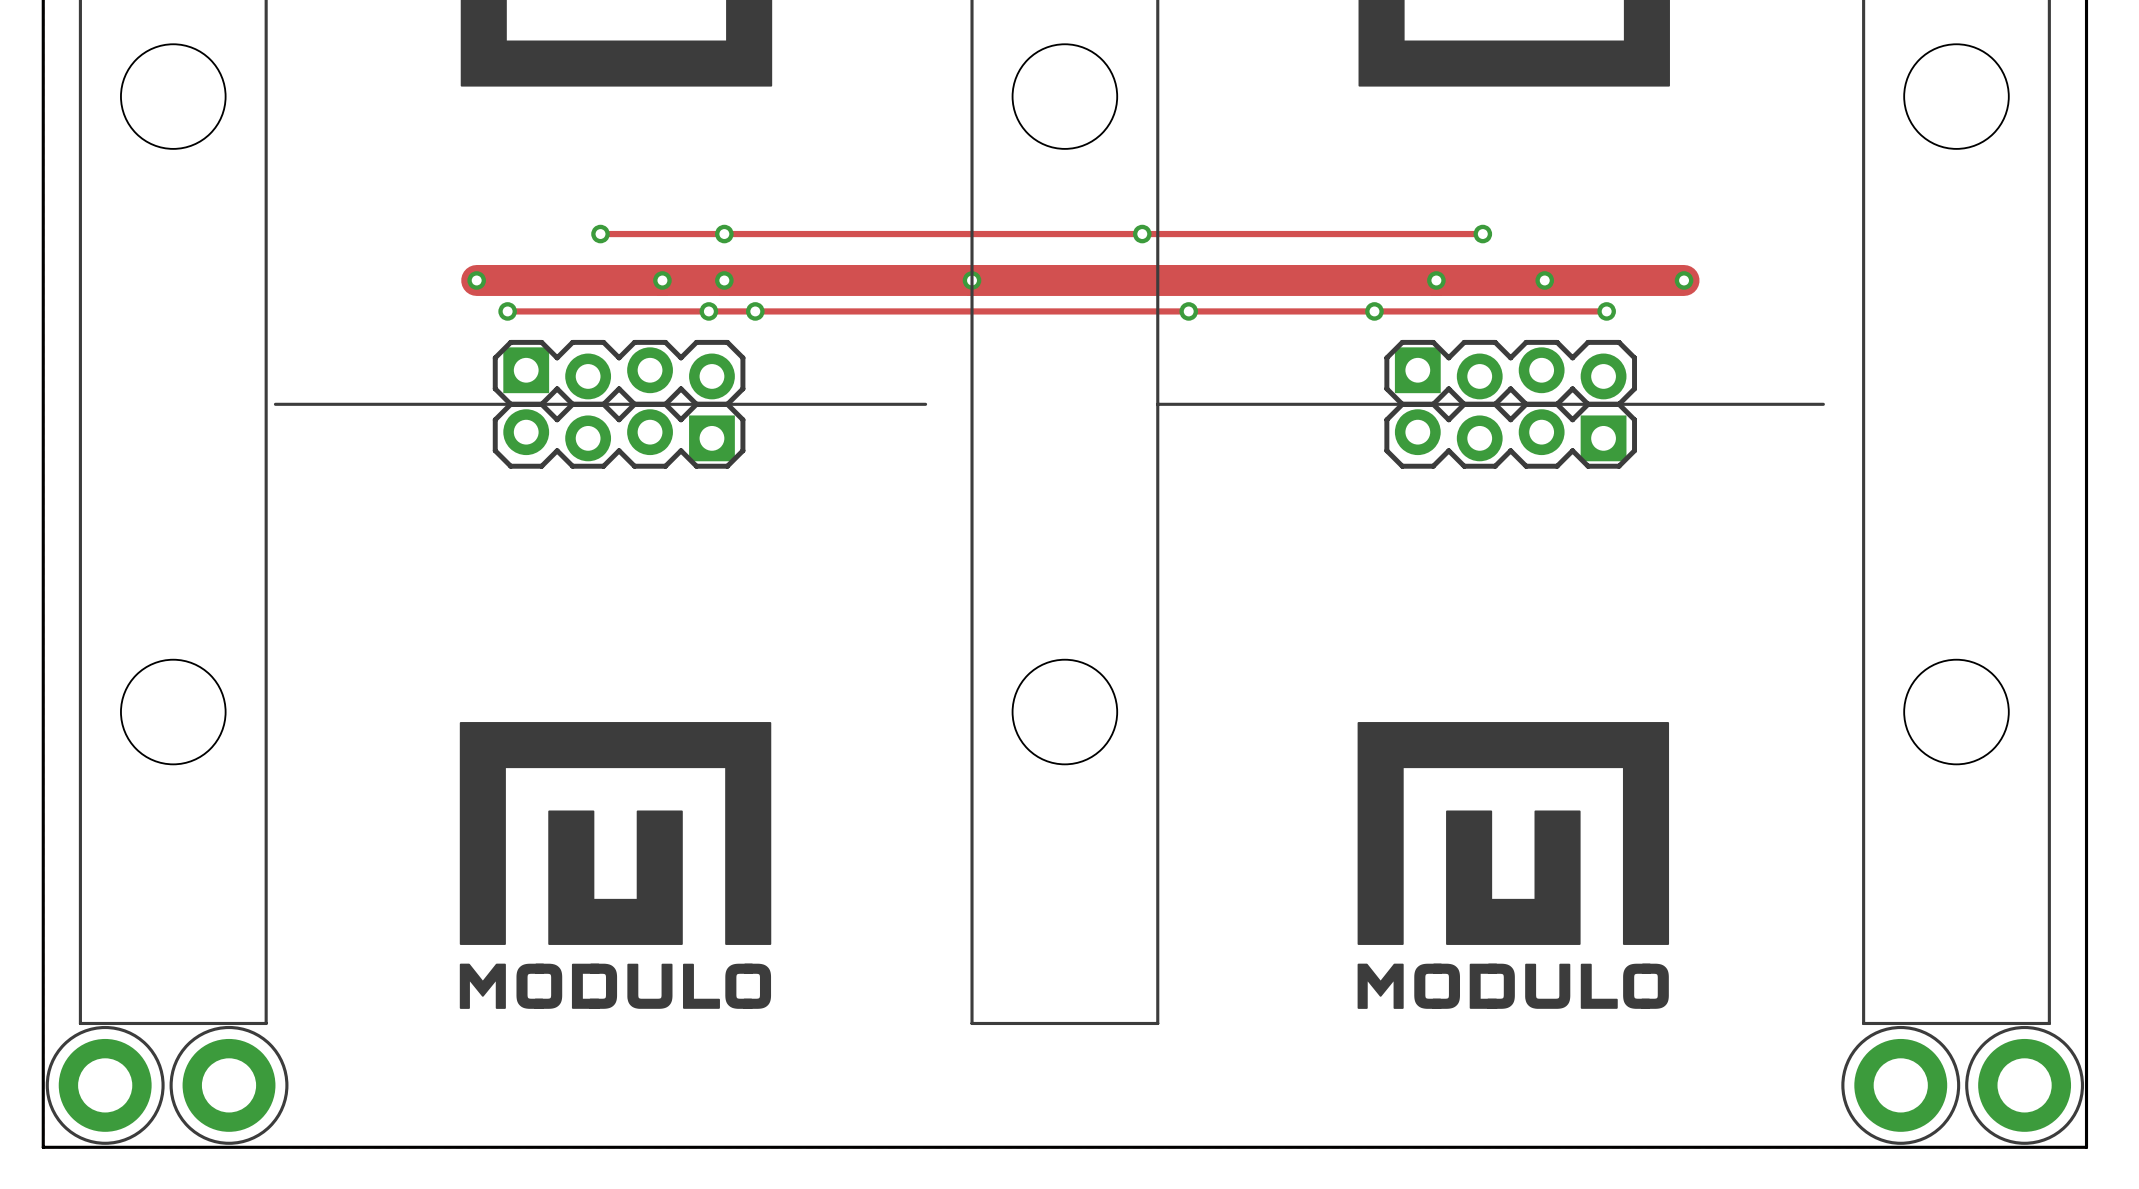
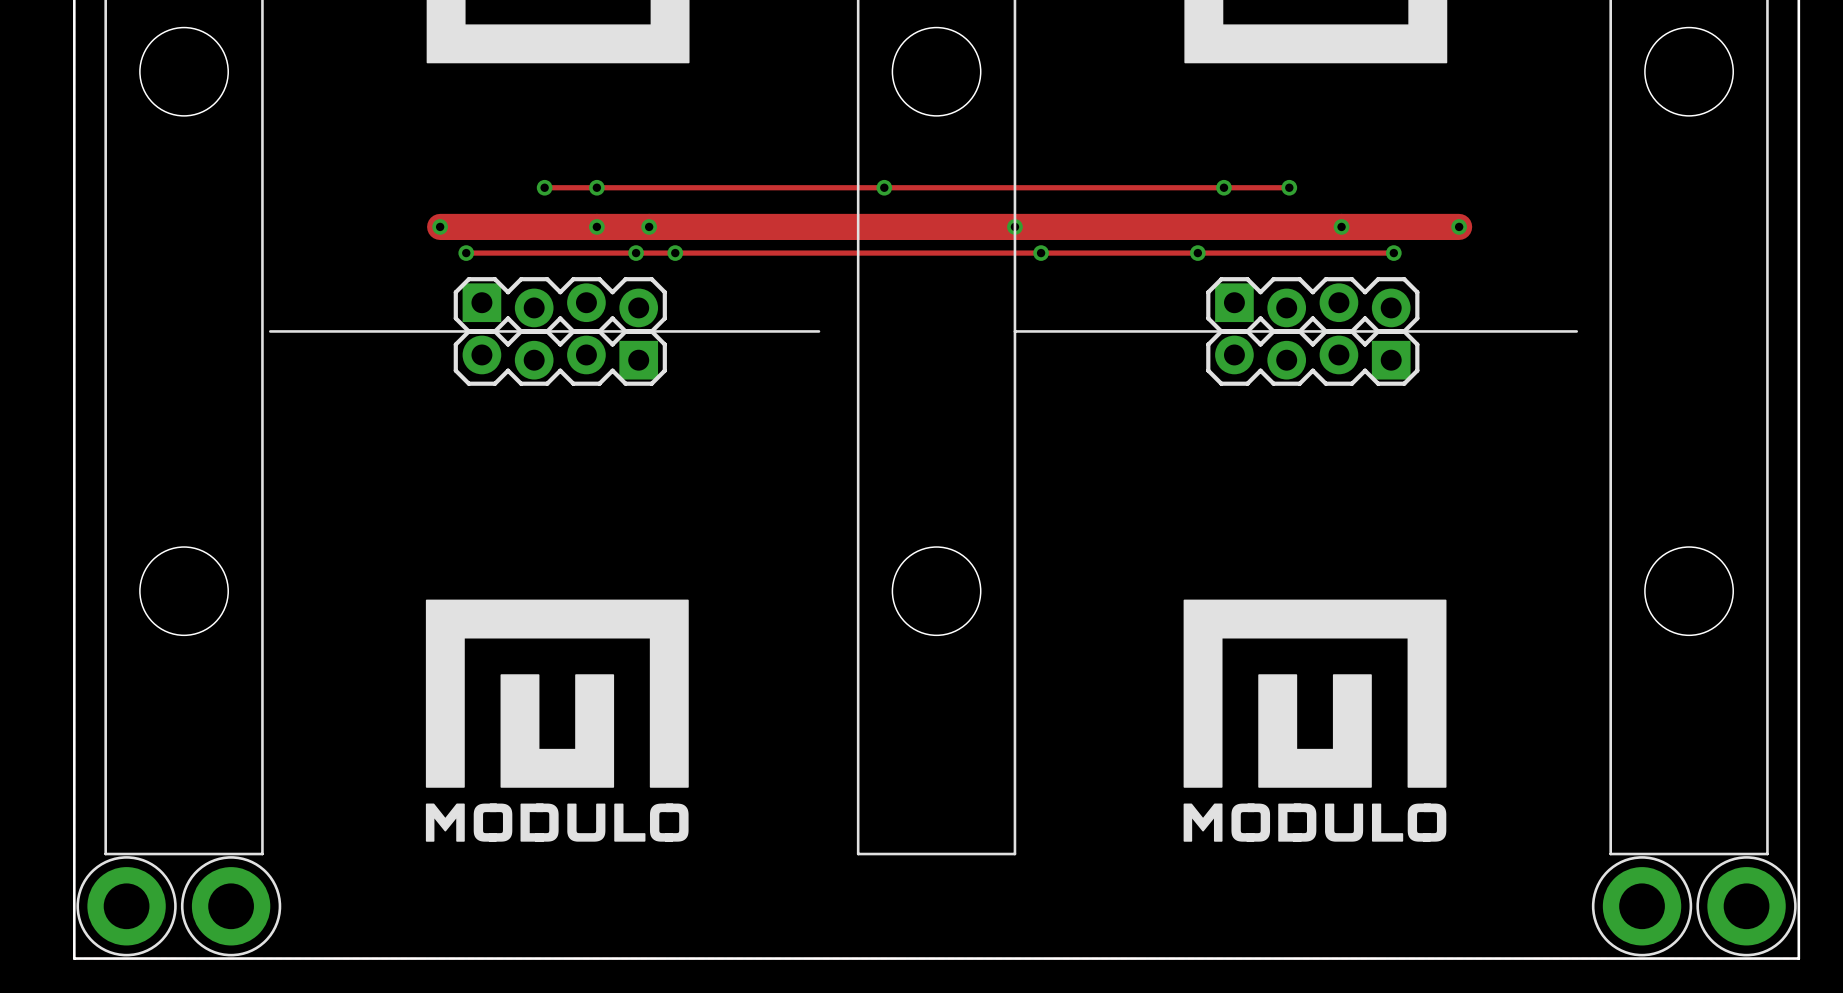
via position: (724, 234) -> (596, 187)
via position: (1142, 234) -> (1014, 226)
via position: (972, 280) -> (884, 187)
via position: (1436, 280) -> (1223, 187)

